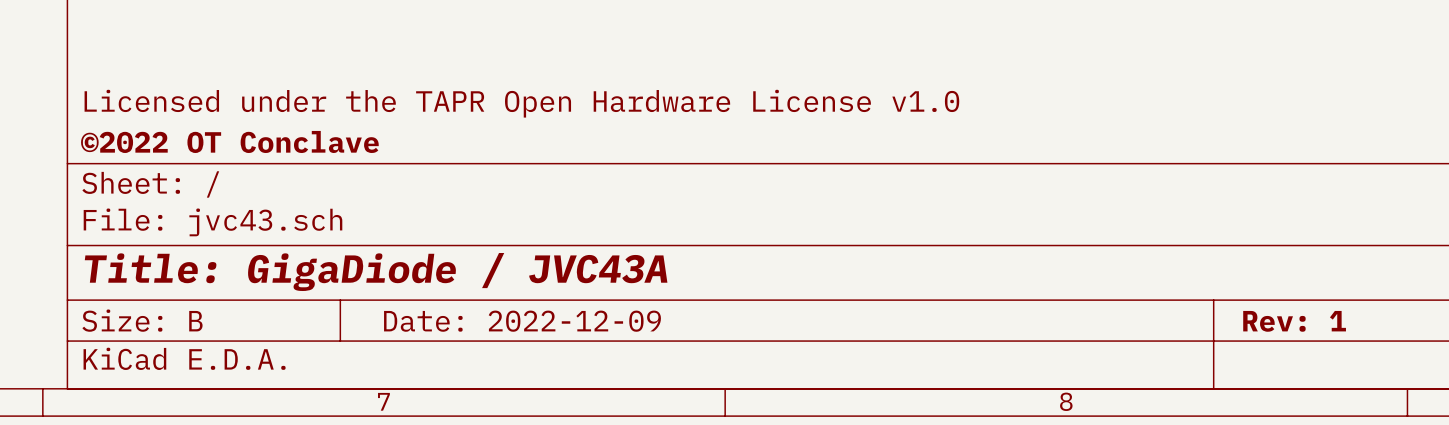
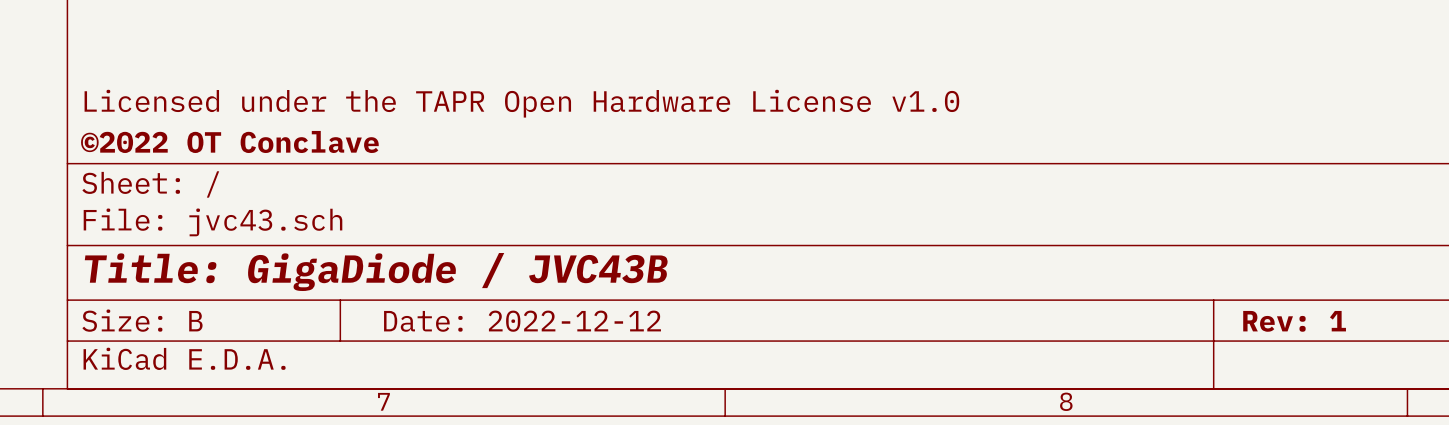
title block: Title: GigaDiode / JVC43A (376, 272) -> Title: GigaDiode / JVC43B (376, 272)
title block: Date: 2022-12-09 (522, 321) -> Date: 2022-12-12 (522, 321)

